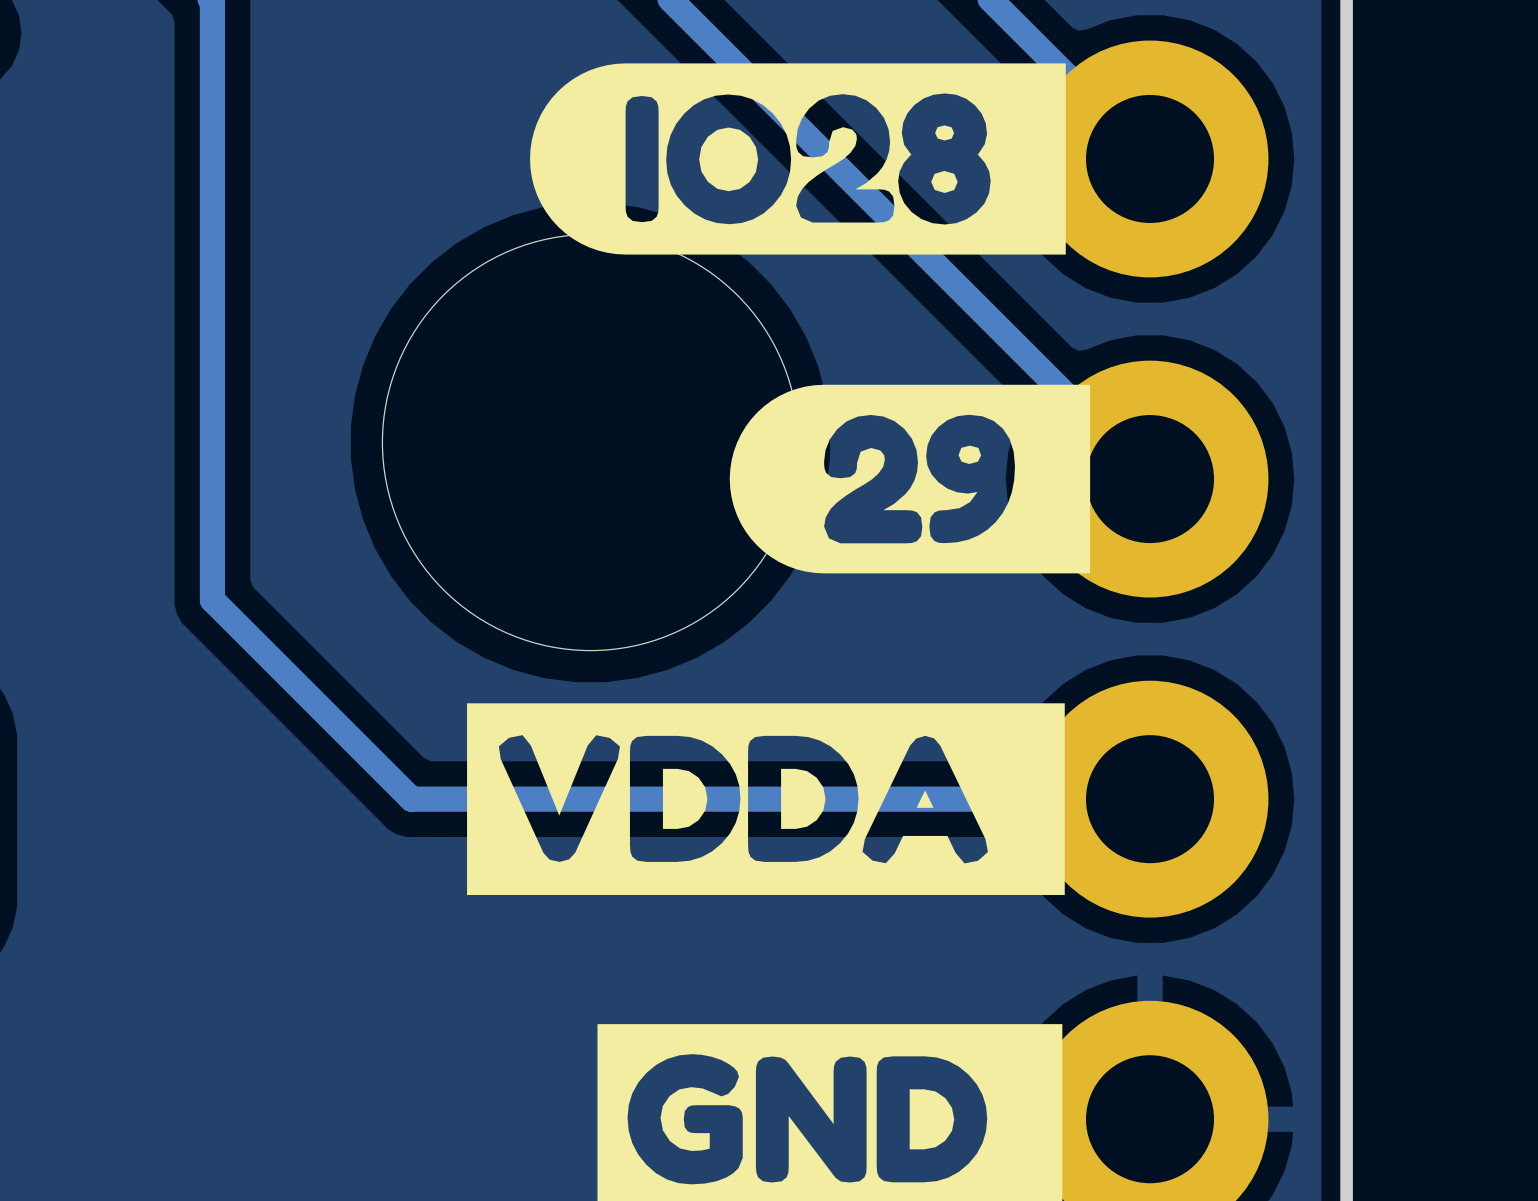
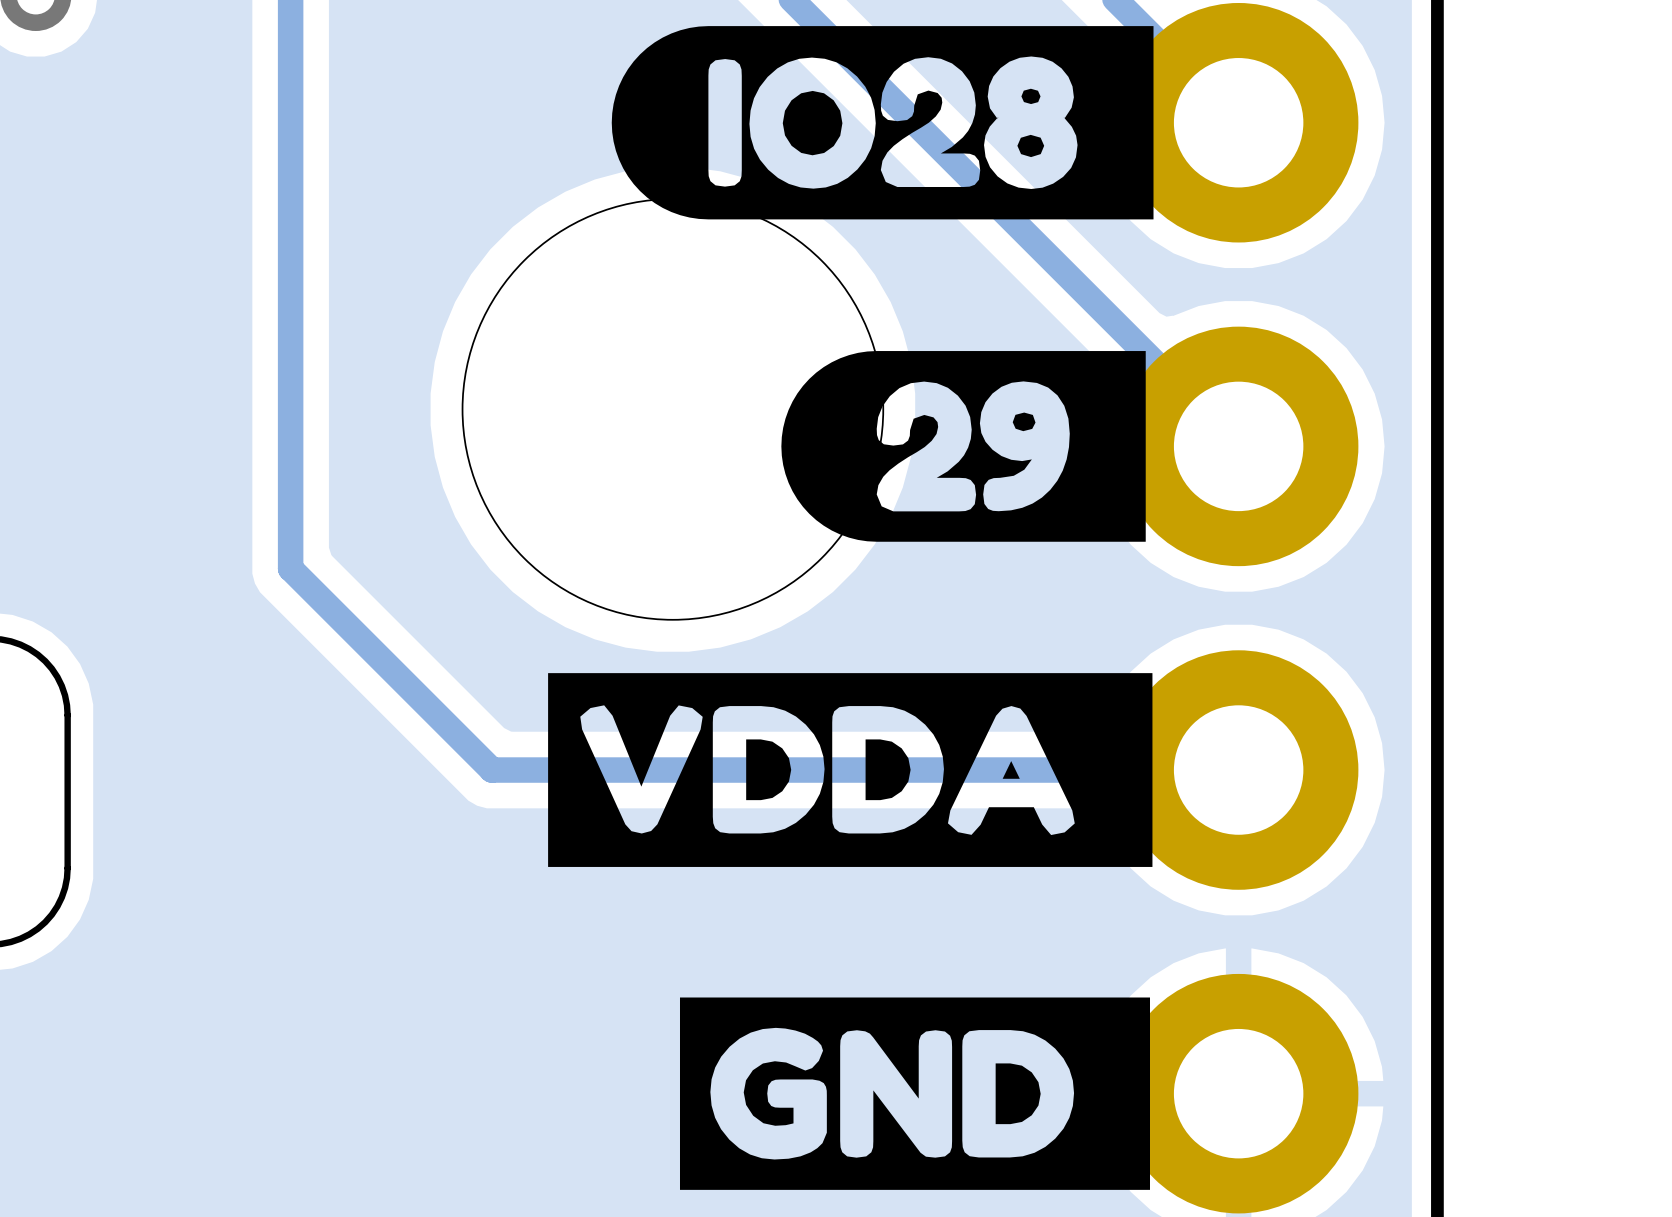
drawing position: (909, 479) -> (963, 446)

